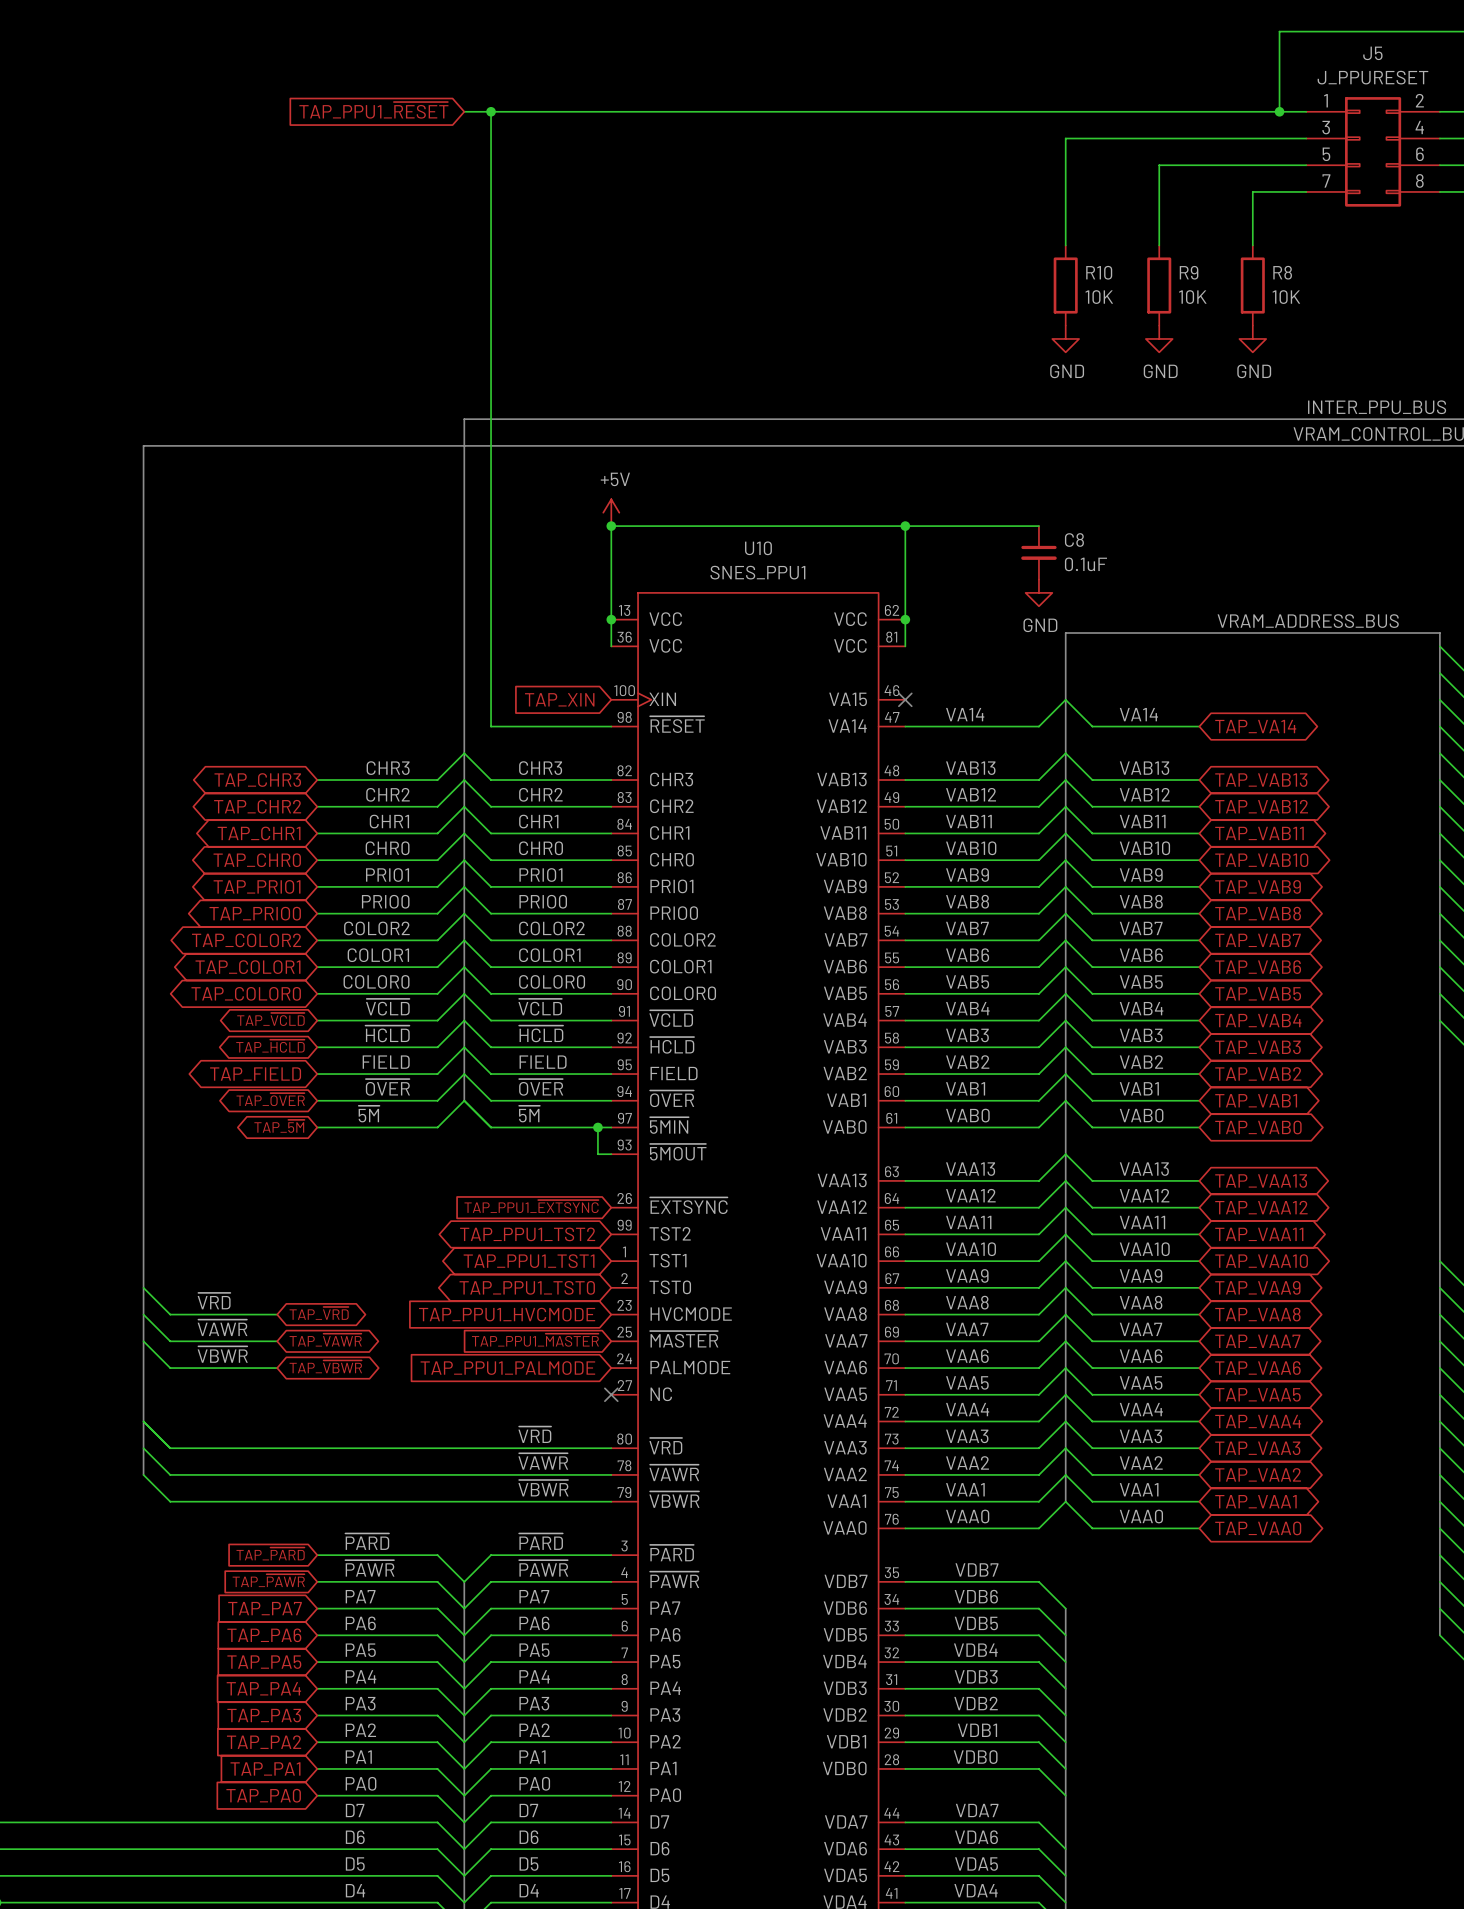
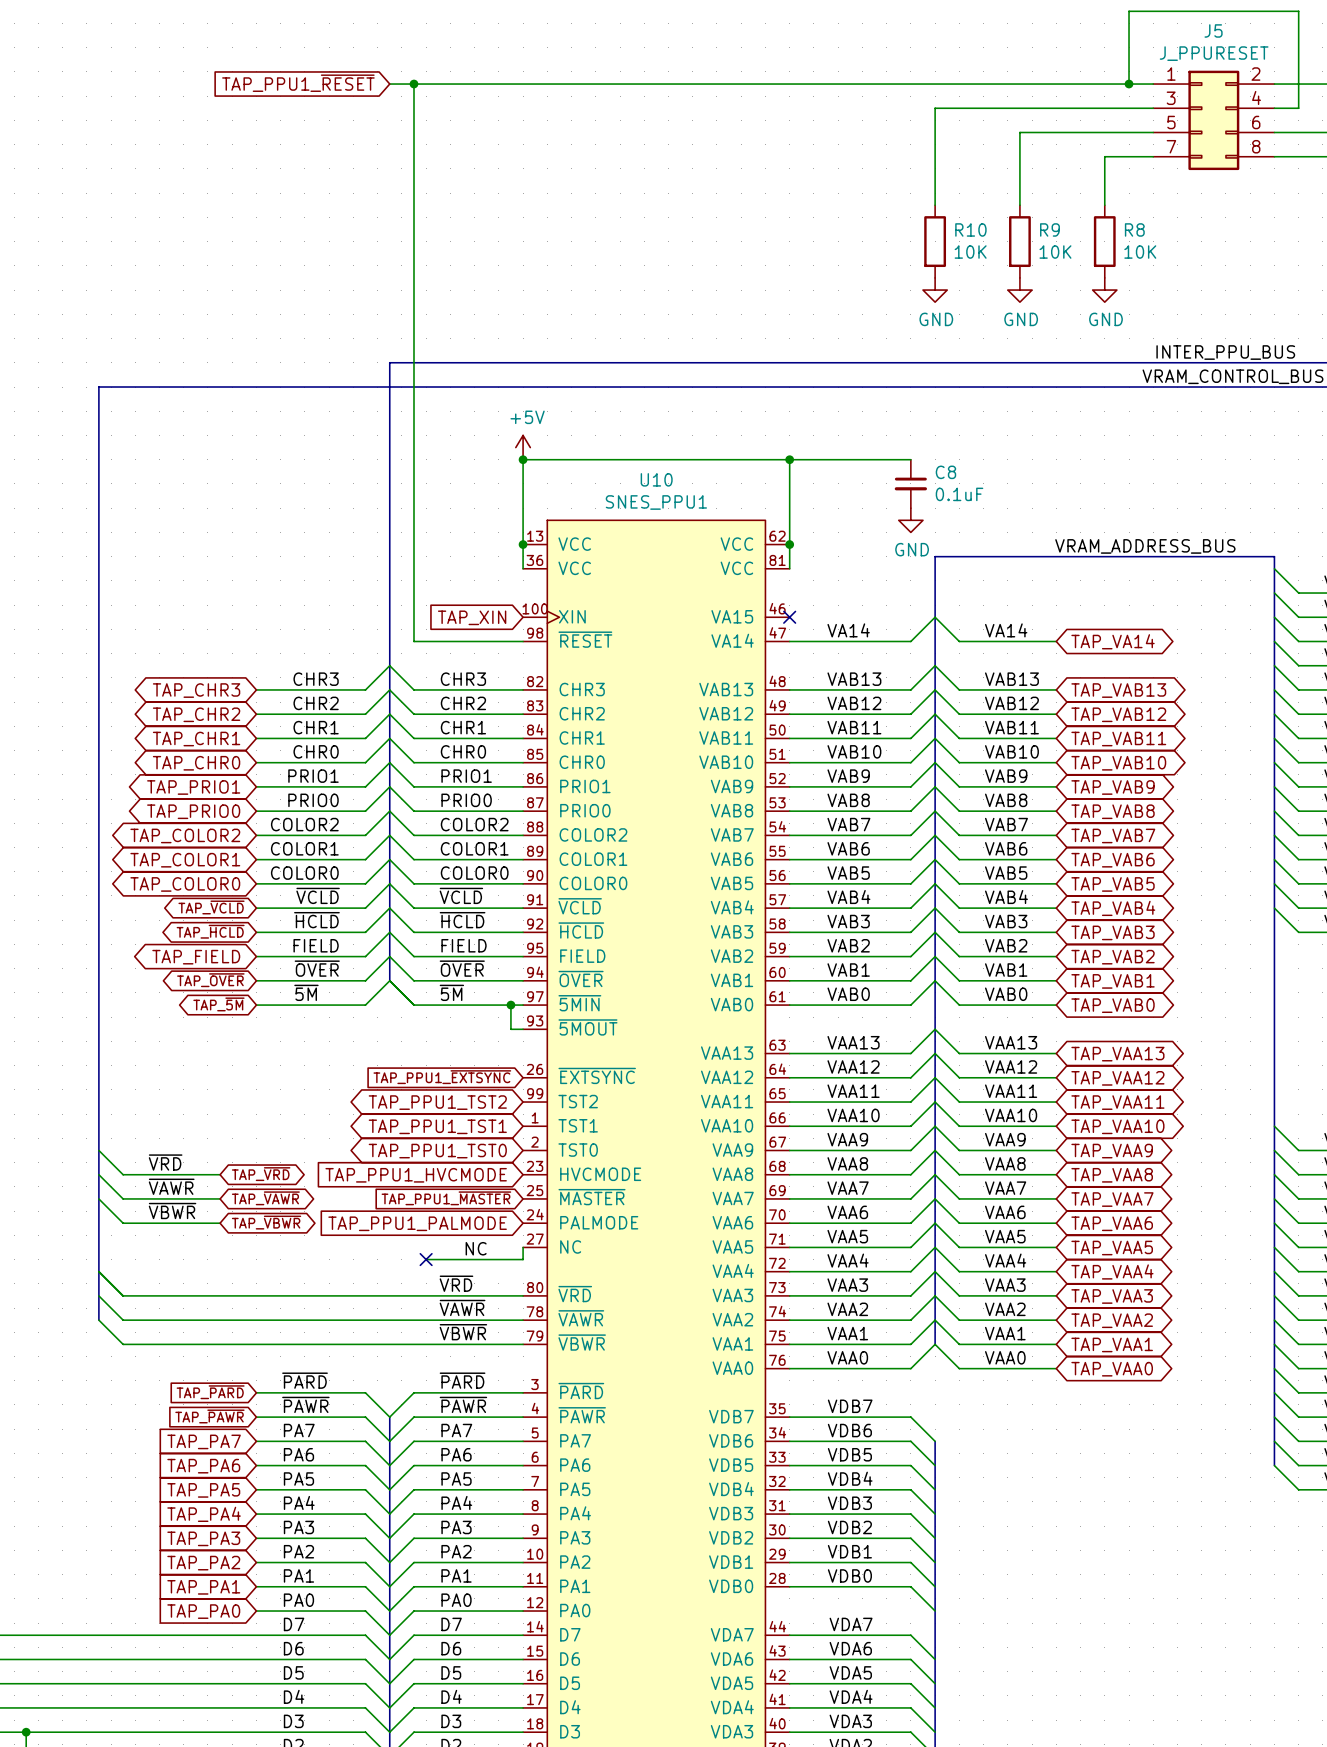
wire: none -> (523, 1247) (523, 1259) (426, 1259)
no-connect mark: (611, 1394) -> none
label: none -> NC (476, 1248)
no-connect mark: none -> (426, 1259)

